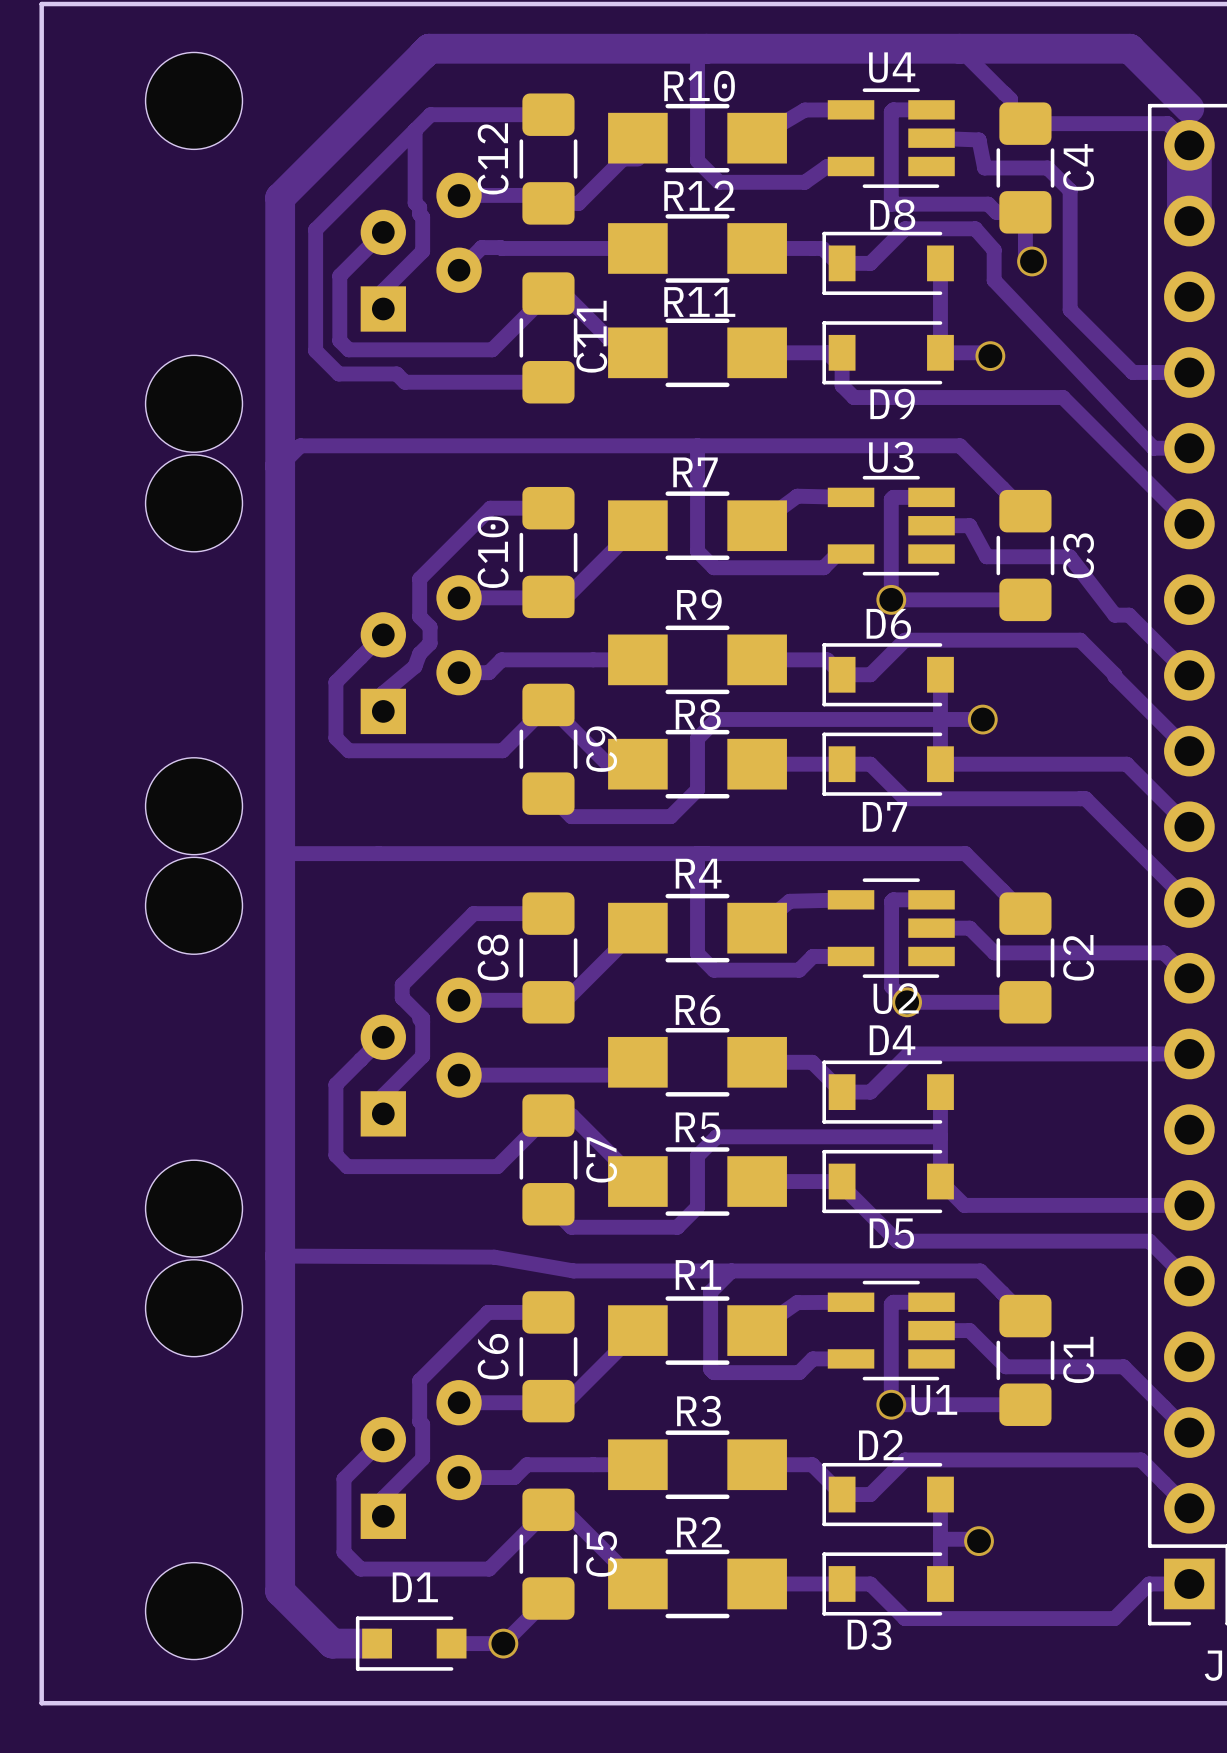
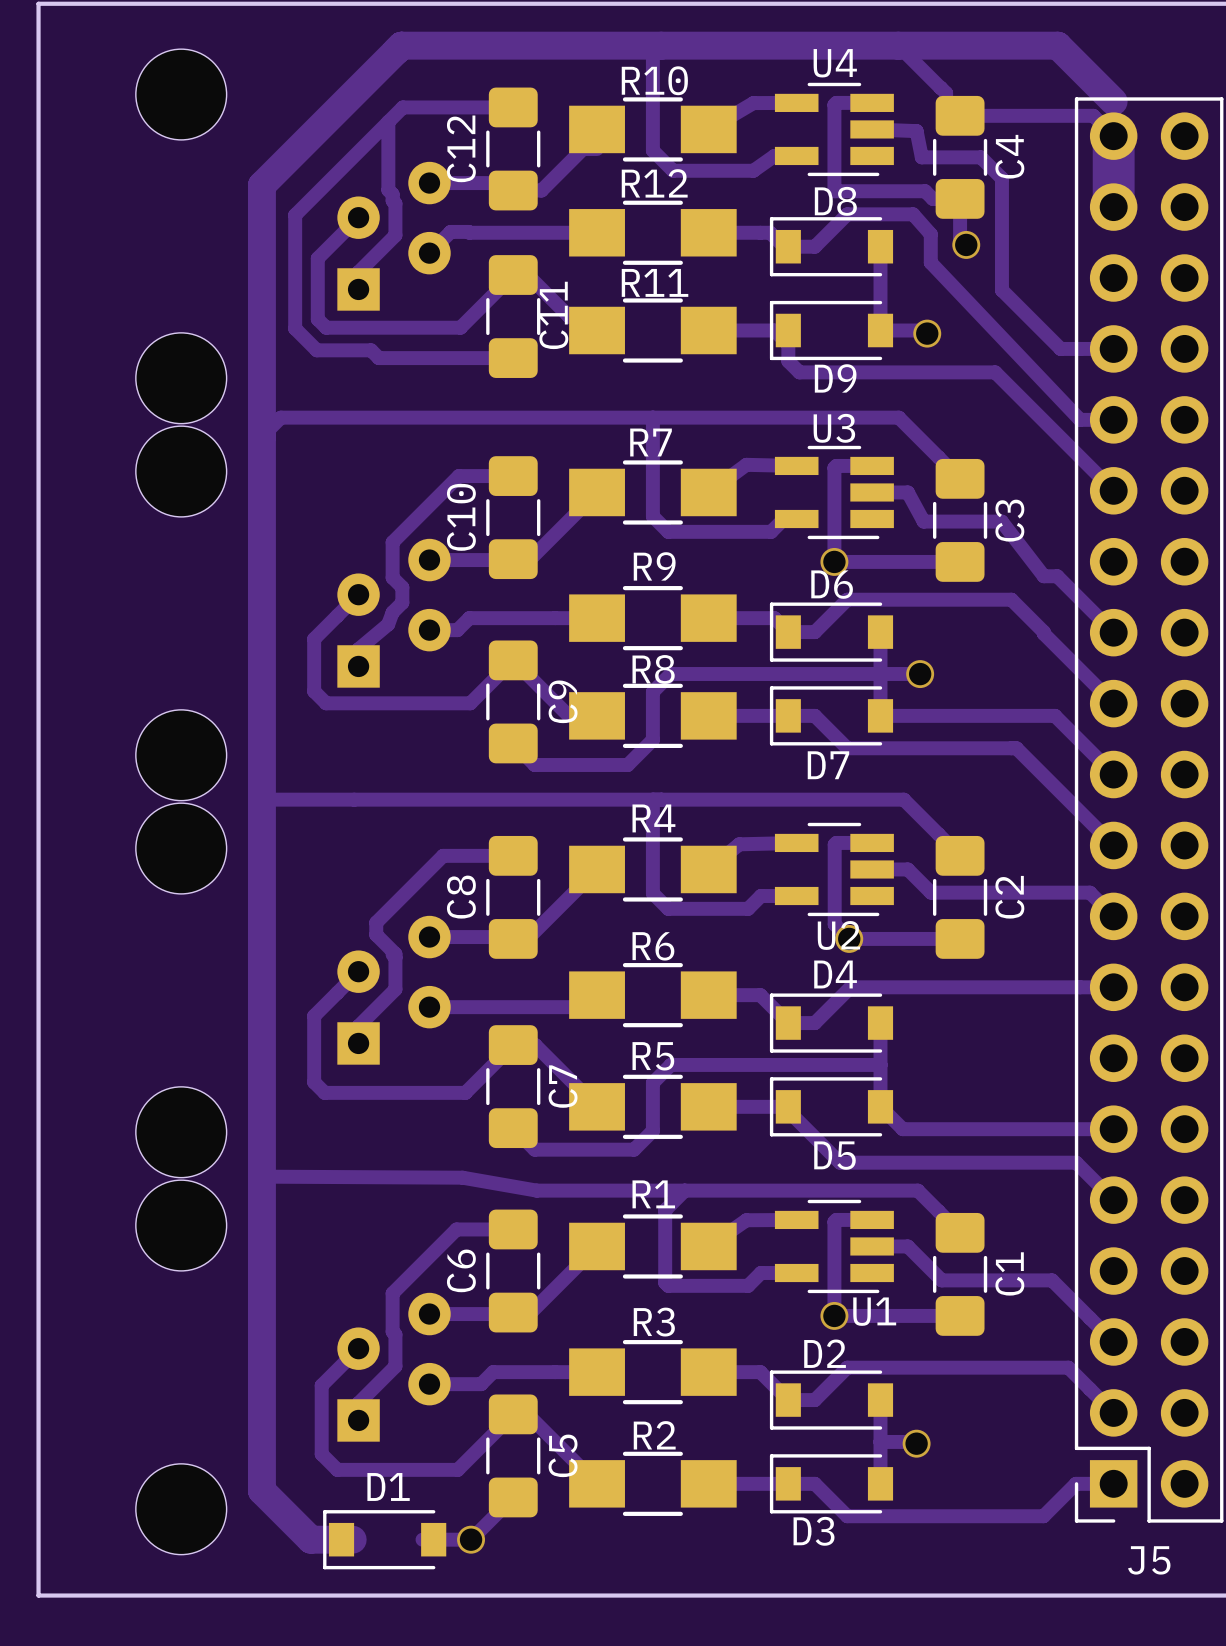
D1 footprint: [355, 1616, 467, 1671] -> [323, 1510, 447, 1570]

